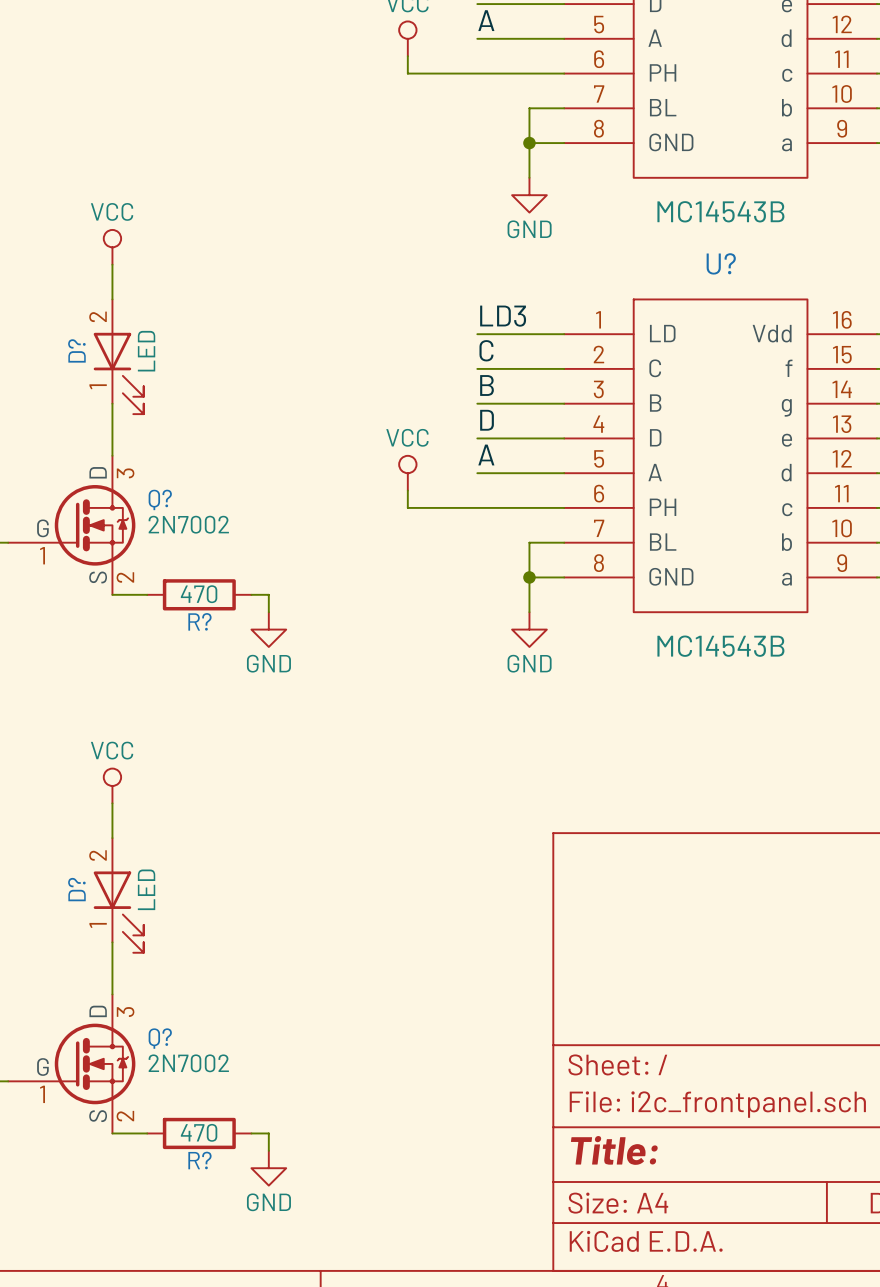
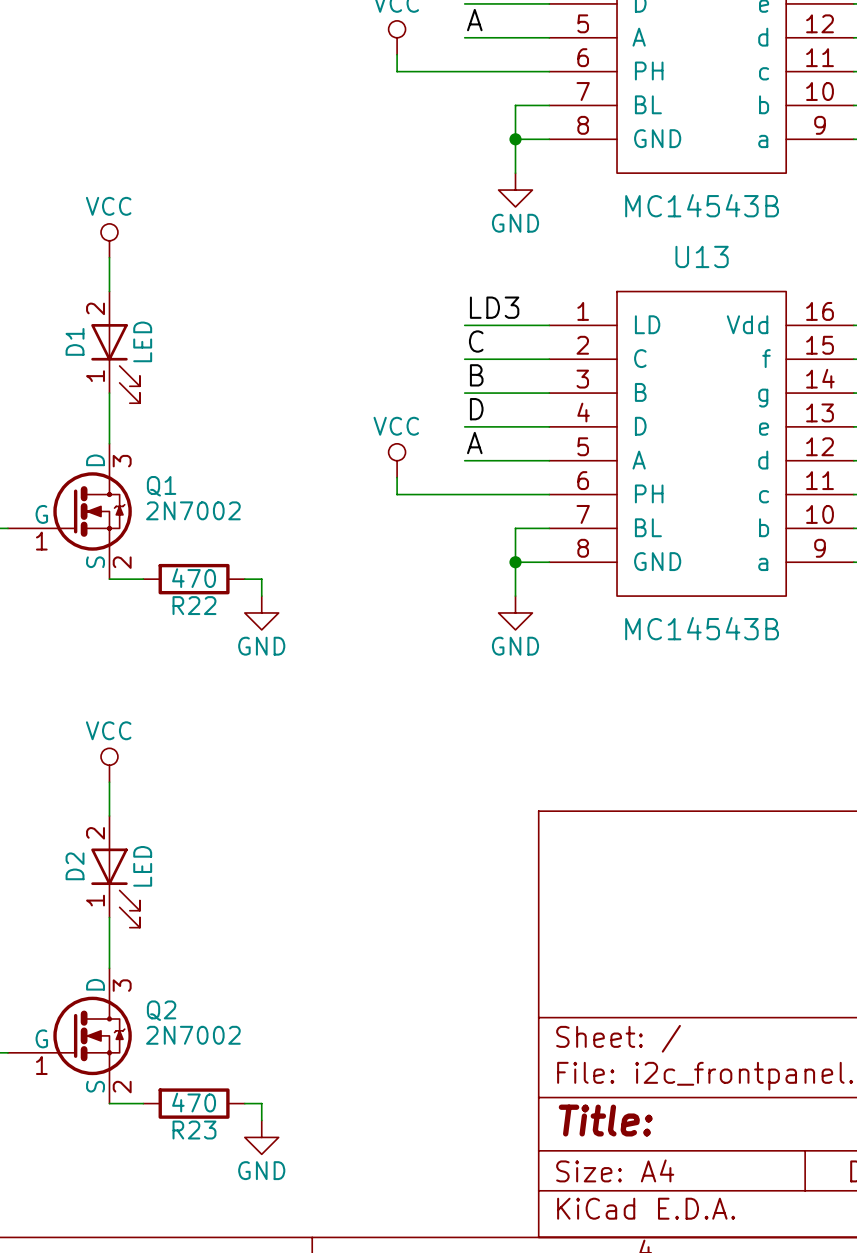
U? name: U? (721, 263) -> U13 (702, 256)
D? name: D? (76, 350) -> D1 (75, 341)
Q? name: Q? (160, 499) -> Q1 (161, 486)
R? name: R? (199, 621) -> R22 (194, 605)
D? name: D? (76, 889) -> D2 (75, 866)
Q? name: Q? (160, 1038) -> Q2 (161, 1010)
R? name: R? (199, 1160) -> R23 (194, 1130)

